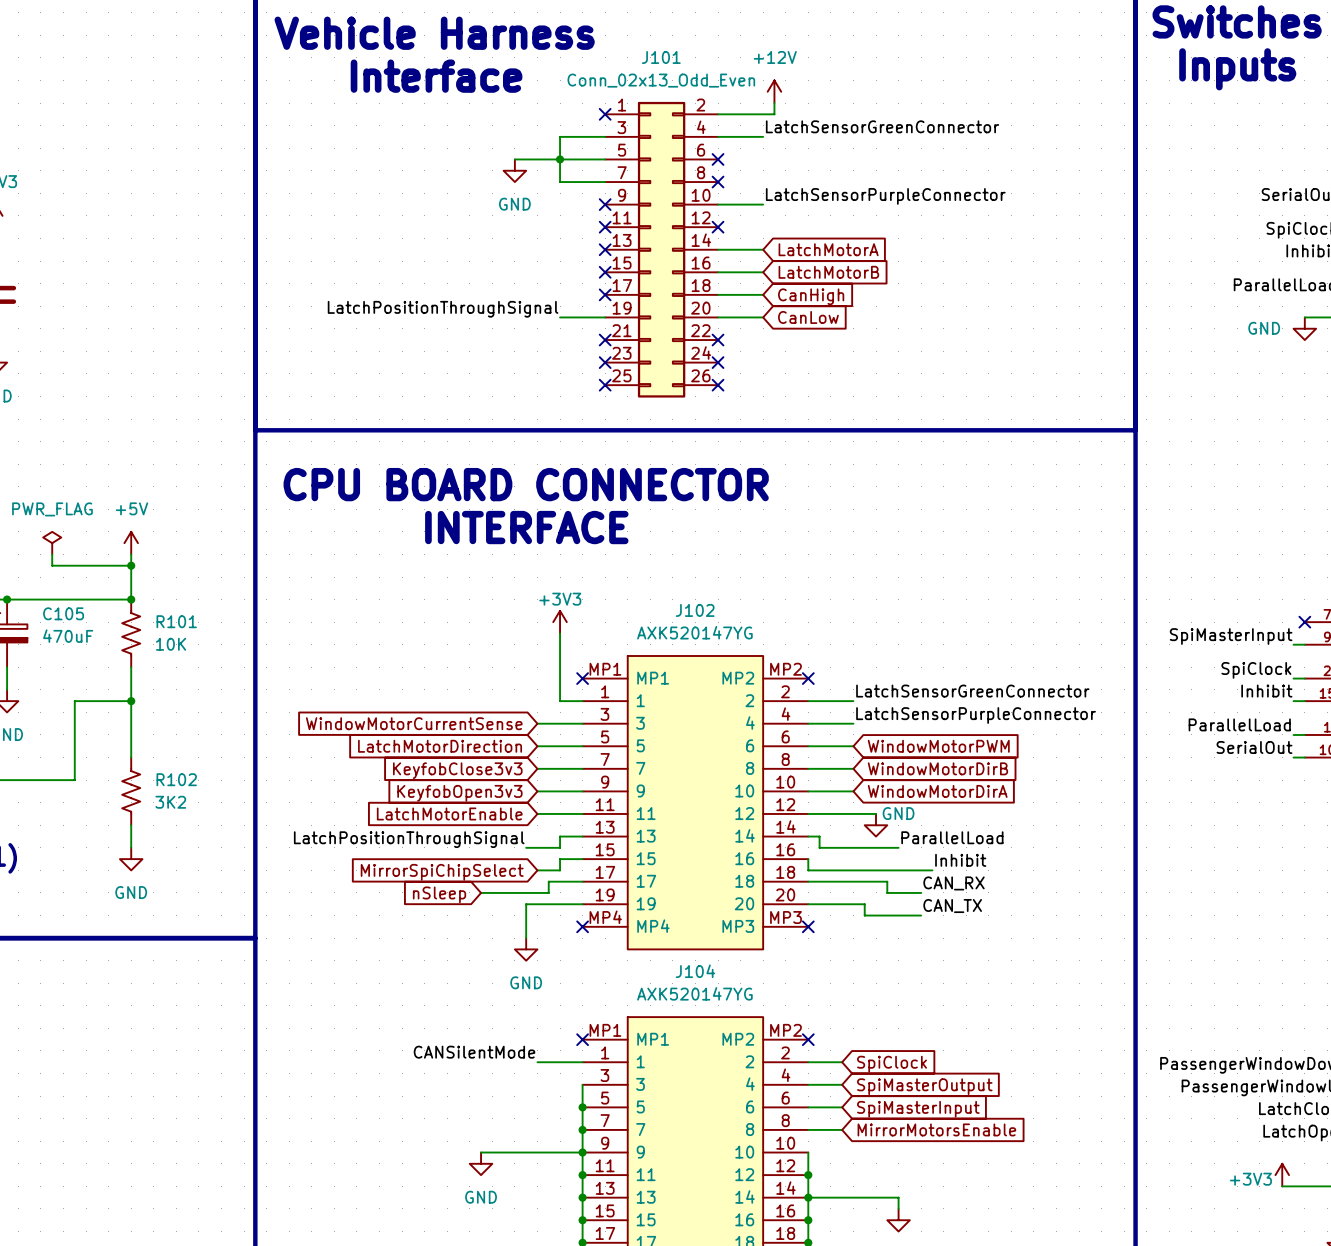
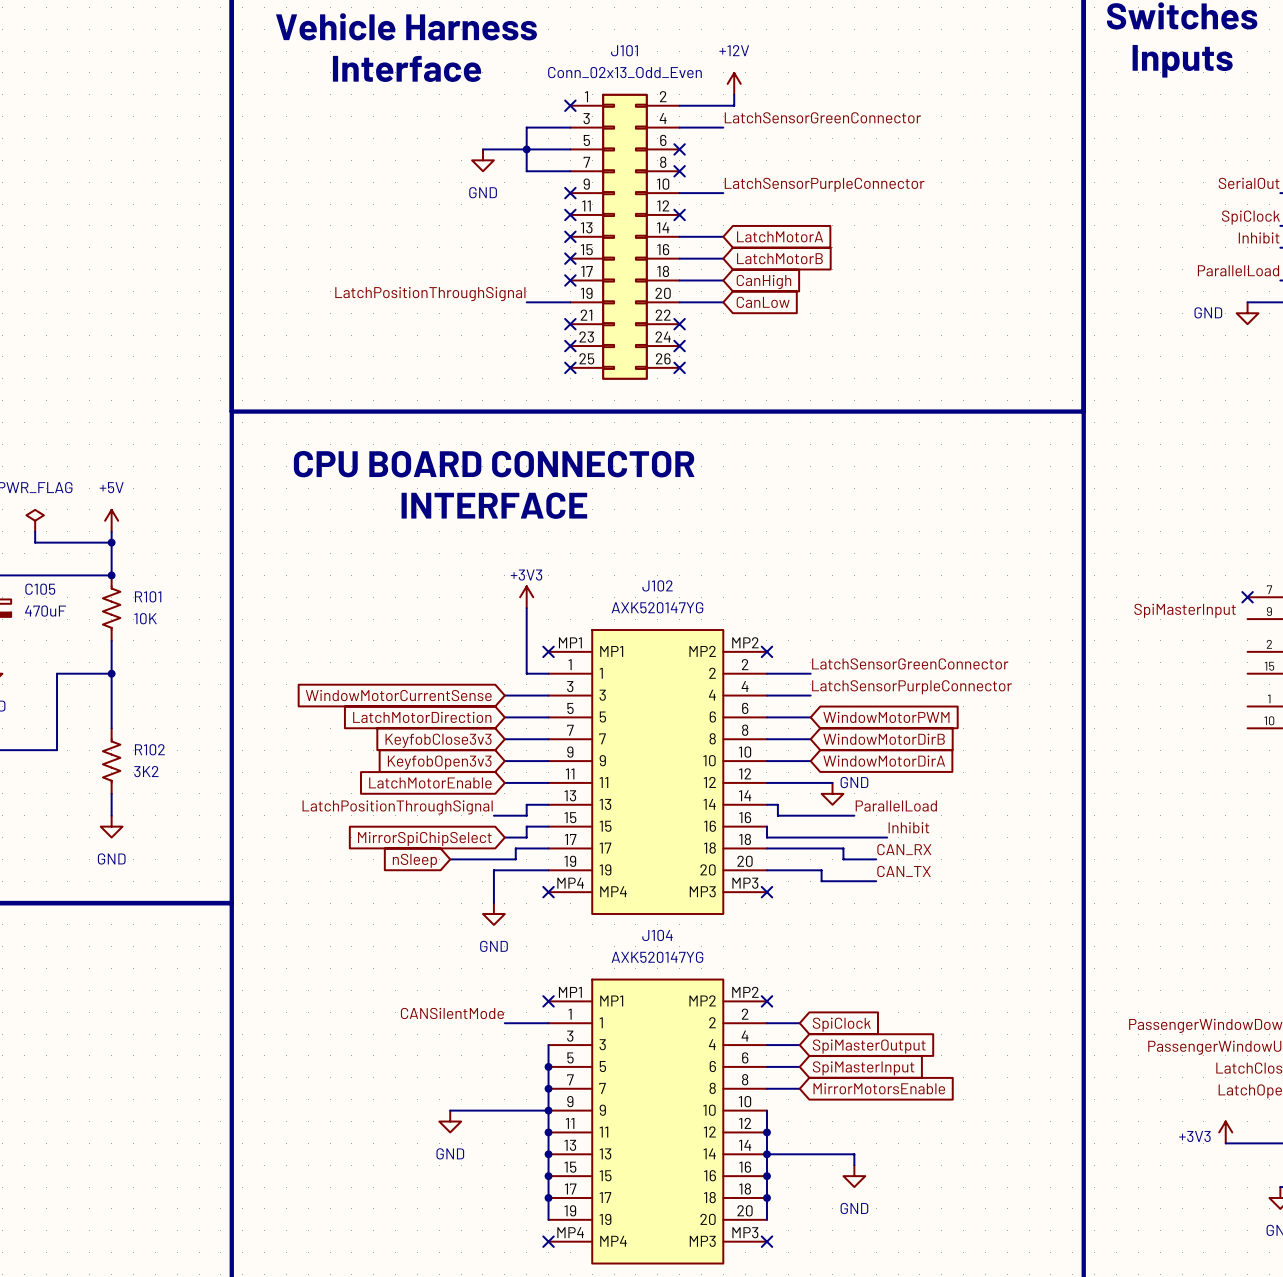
wire: (1293, 644) (1304, 644) -> none
label: SpiClock (1256, 670) -> none
wire: (1293, 678) (1304, 678) -> none
label: Inhibit (1266, 691) -> none
wire: (1293, 701) (1304, 701) -> none
label: ParallelLoad (1239, 724) -> none
wire: (1293, 734) (1304, 734) -> none
label: SerialOut (1254, 747) -> none
wire: (1293, 757) (1304, 757) -> none

